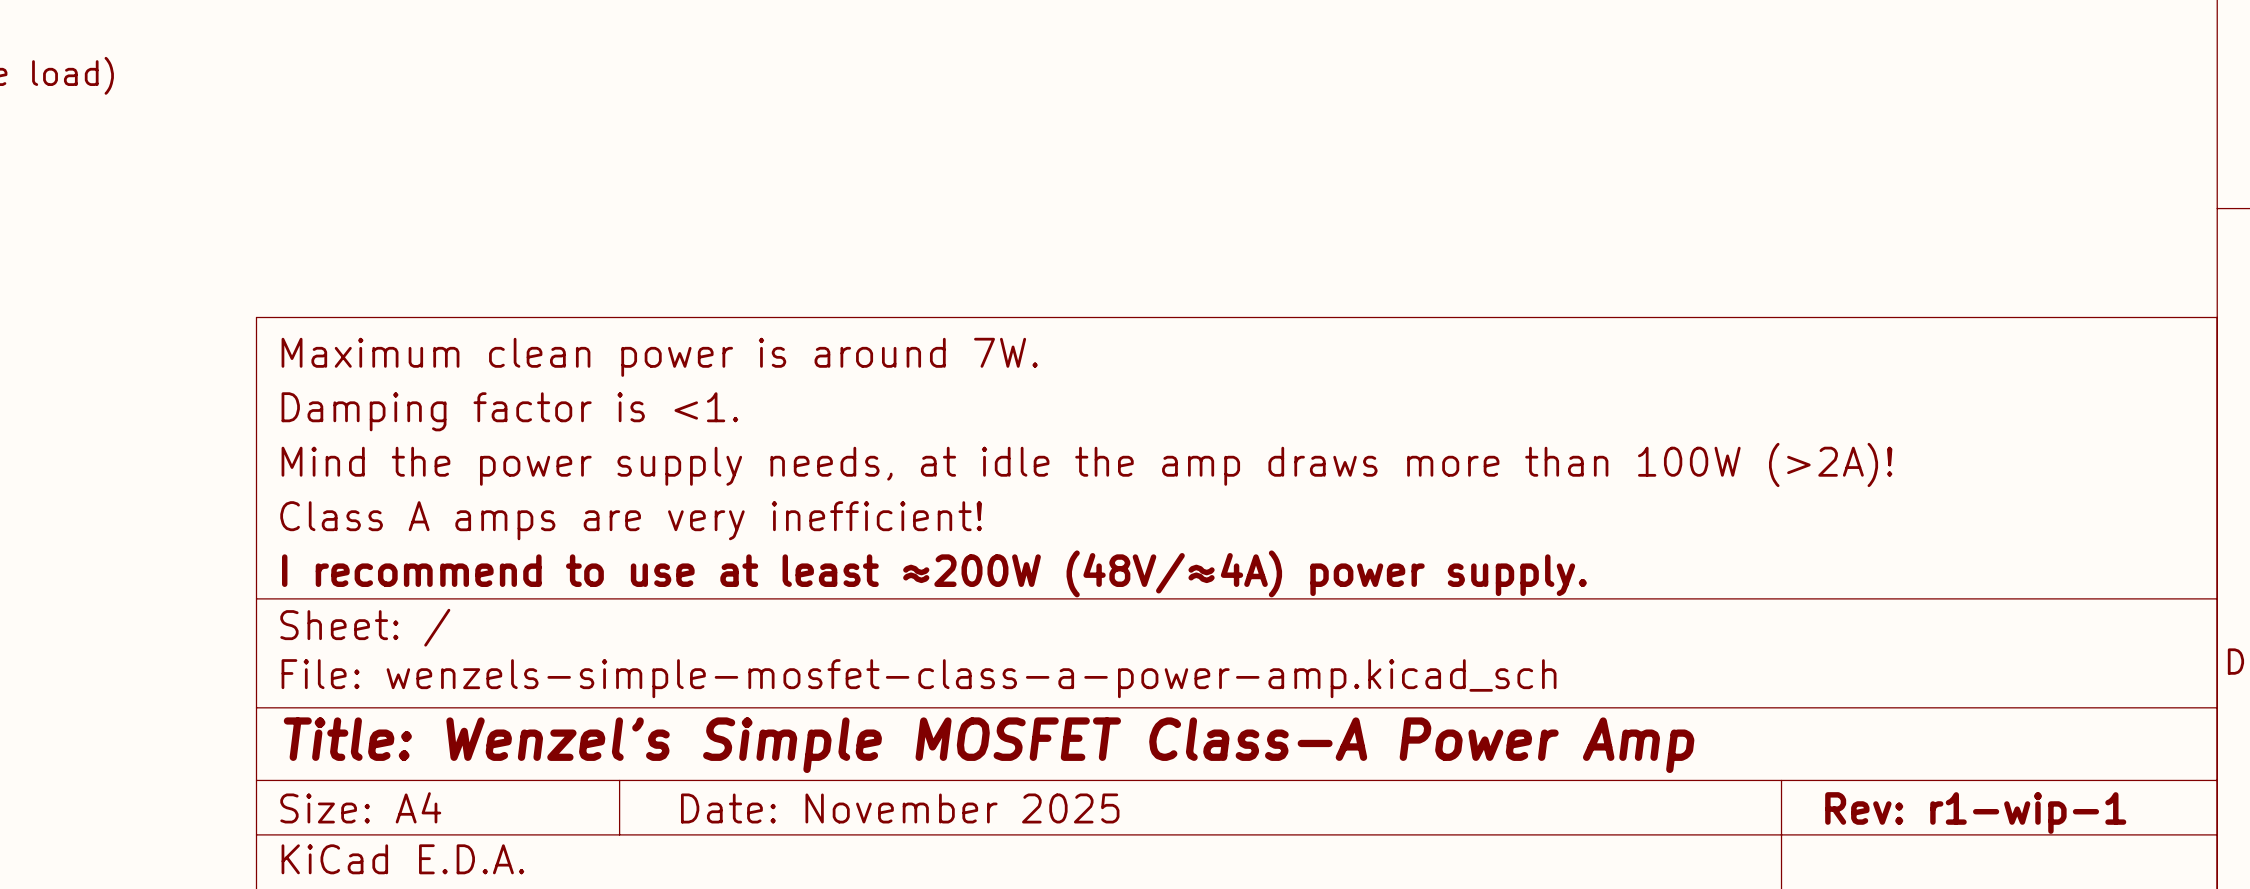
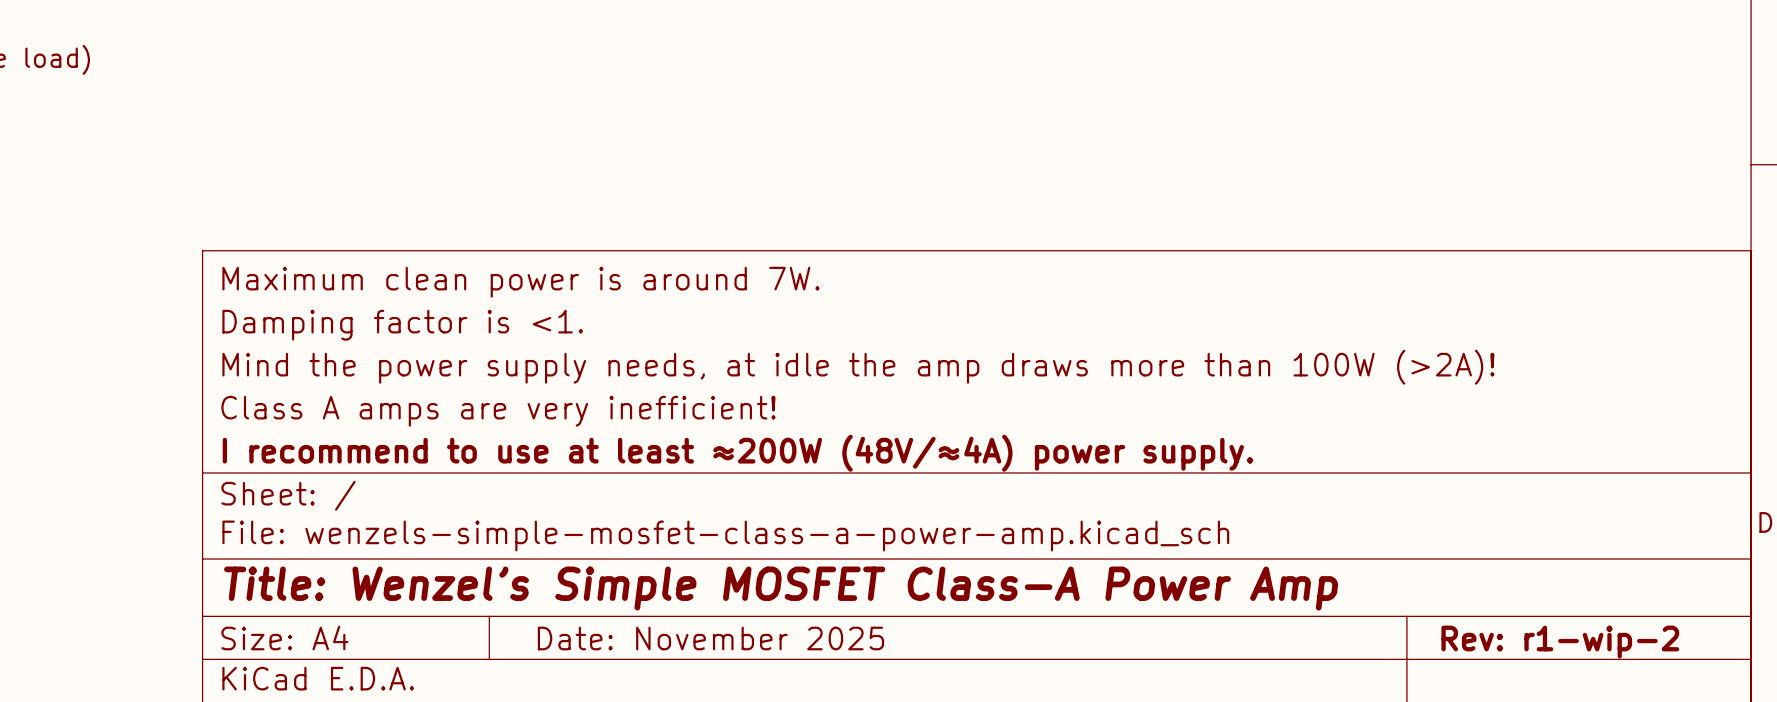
title block: Rev: r1-wip-1 (1975, 813) -> Rev: r1-wip-2 (1560, 642)

